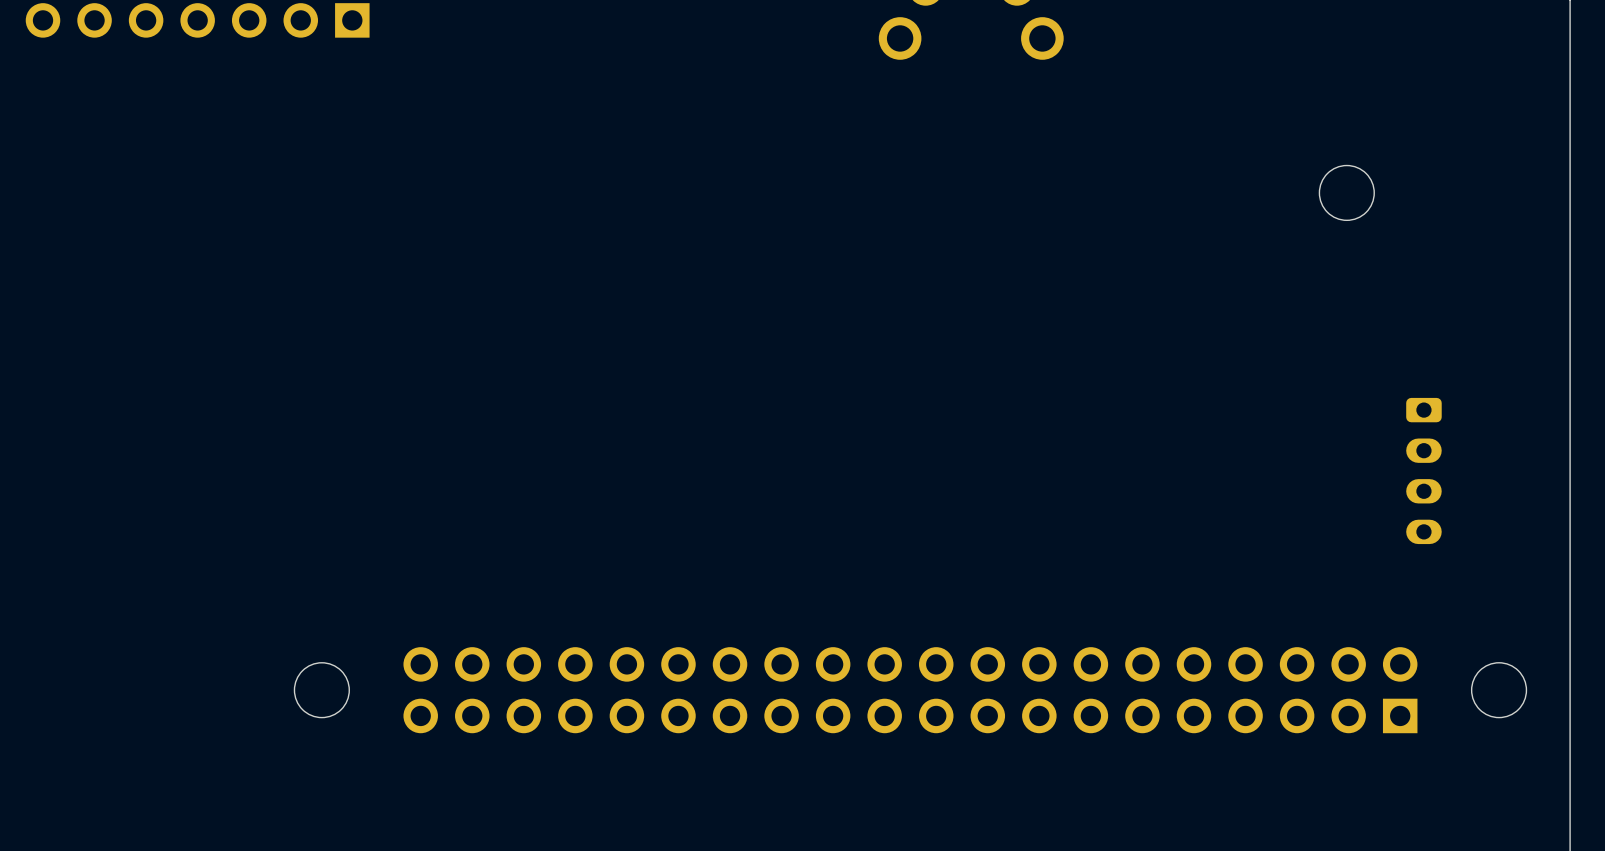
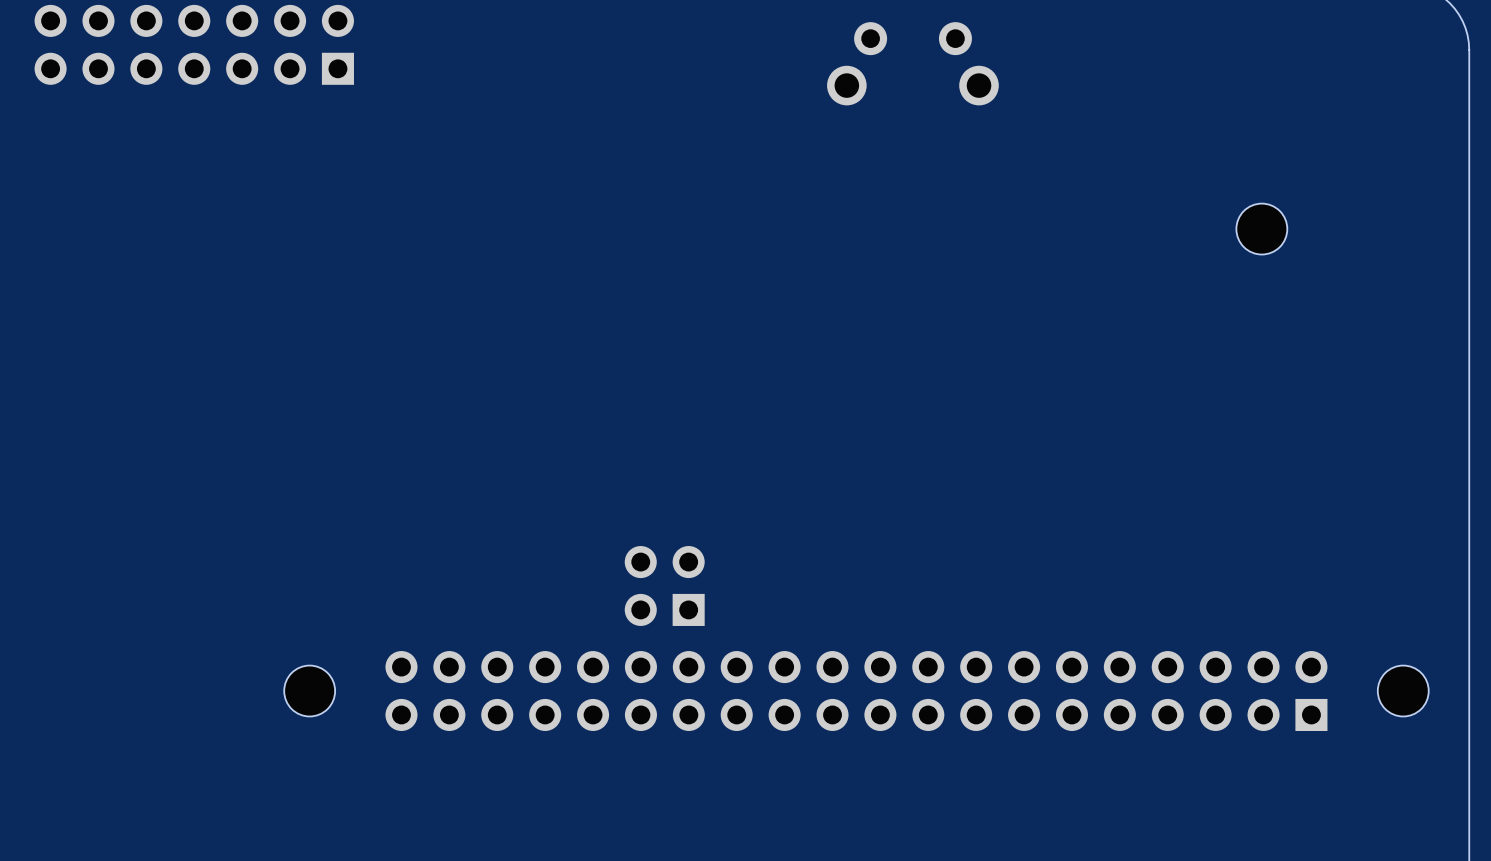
part: (1423, 470) -> none
part: none -> (664, 585)

